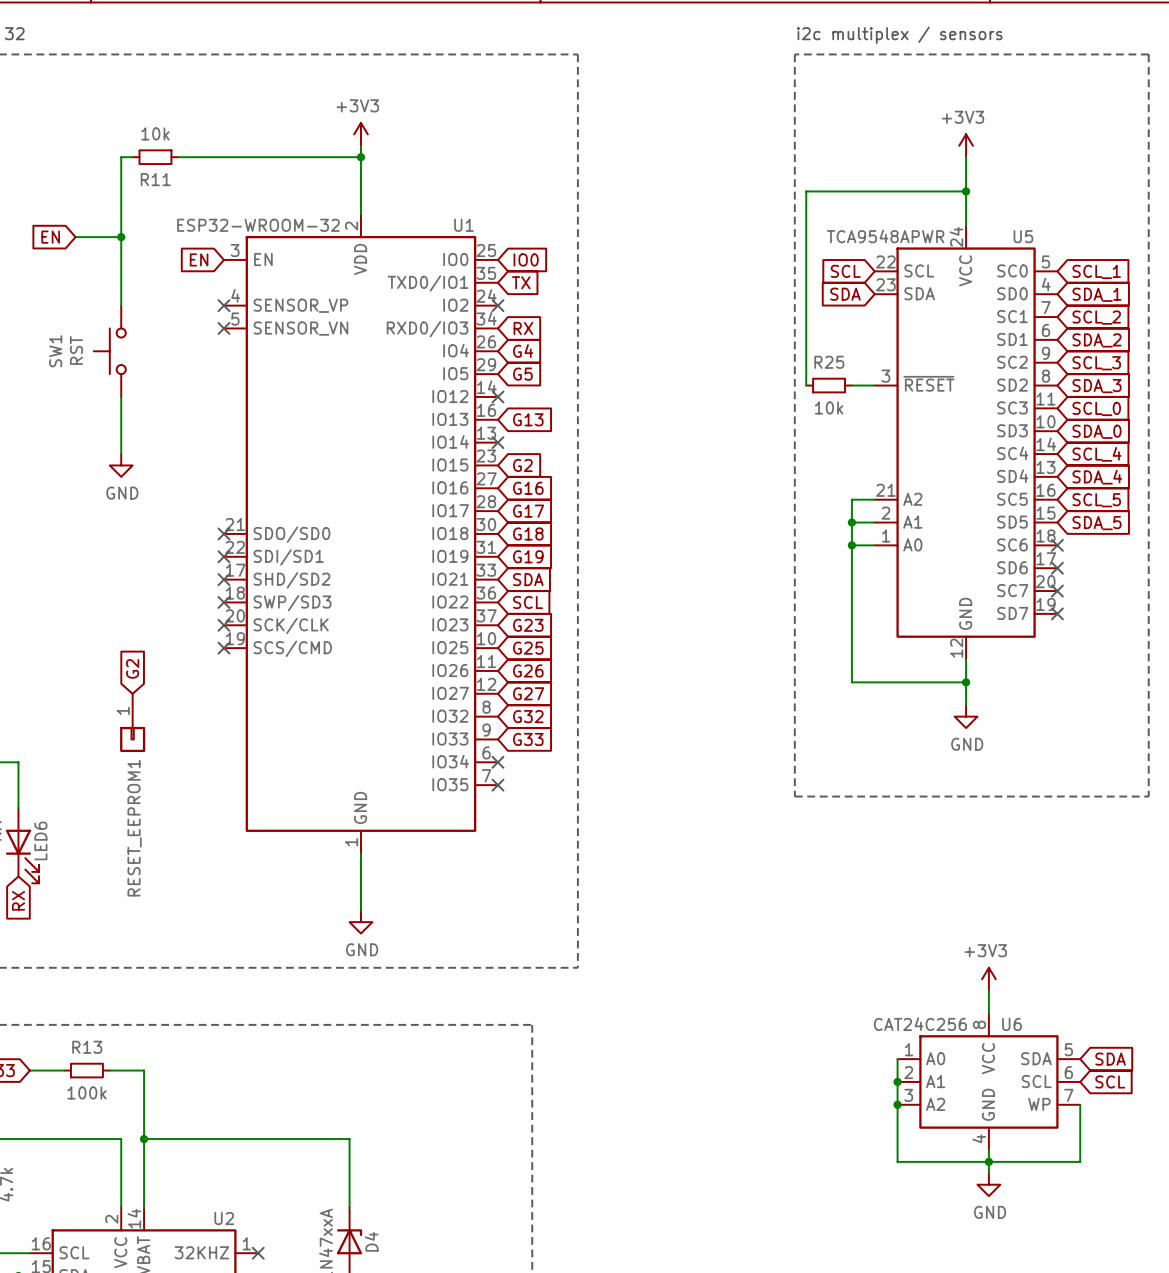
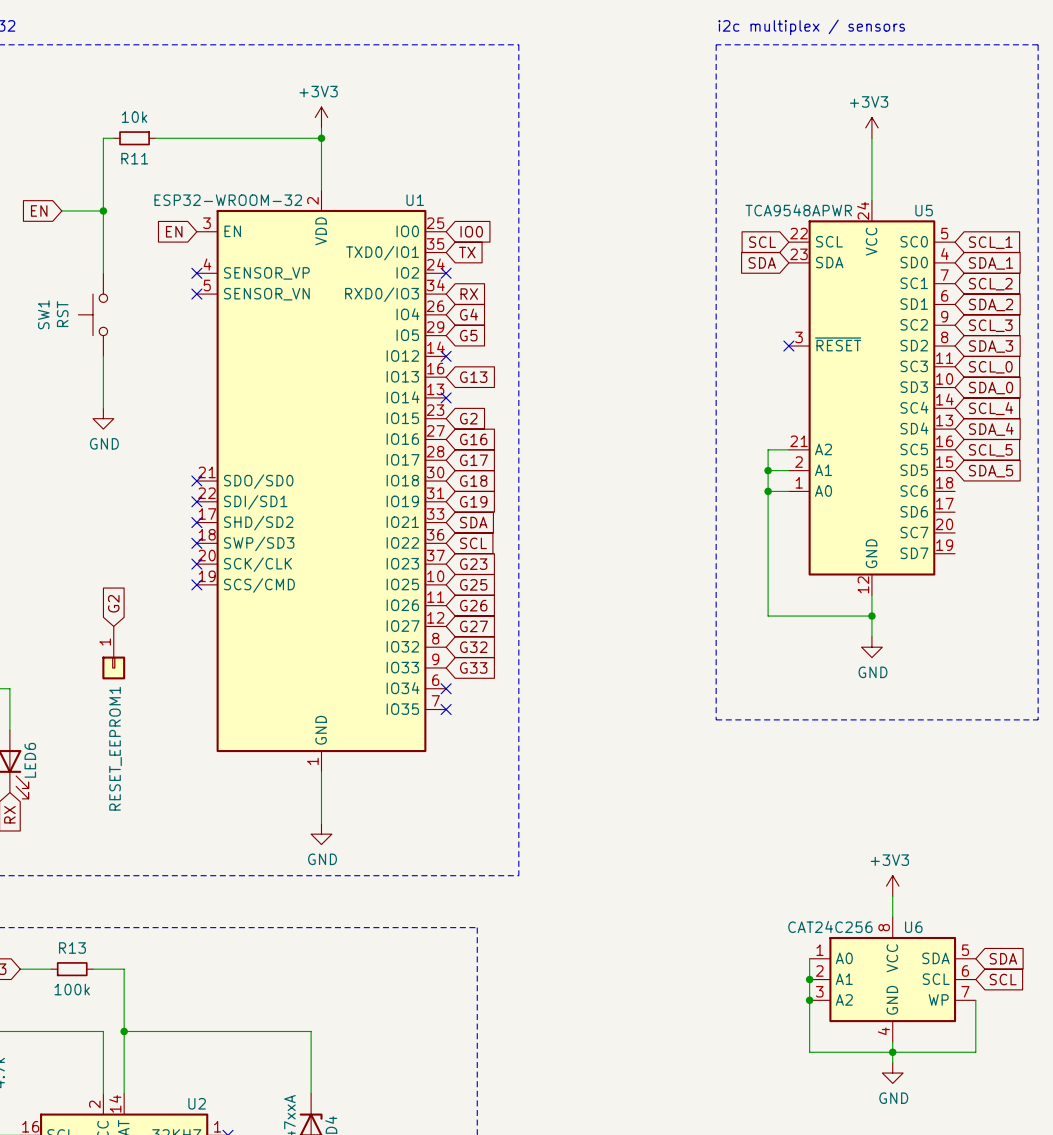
wire: (966, 191) (806, 191) (806, 385) -> none
junction: (966, 191) -> none
R25: 10k (829, 385) -> none
wire: (851, 385) (874, 385) -> none
no-connect mark: none -> (788, 346)
no-connect mark: (1057, 545) -> none
no-connect mark: (1057, 568) -> none
no-connect mark: (1057, 591) -> none
no-connect mark: (1057, 613) -> none

